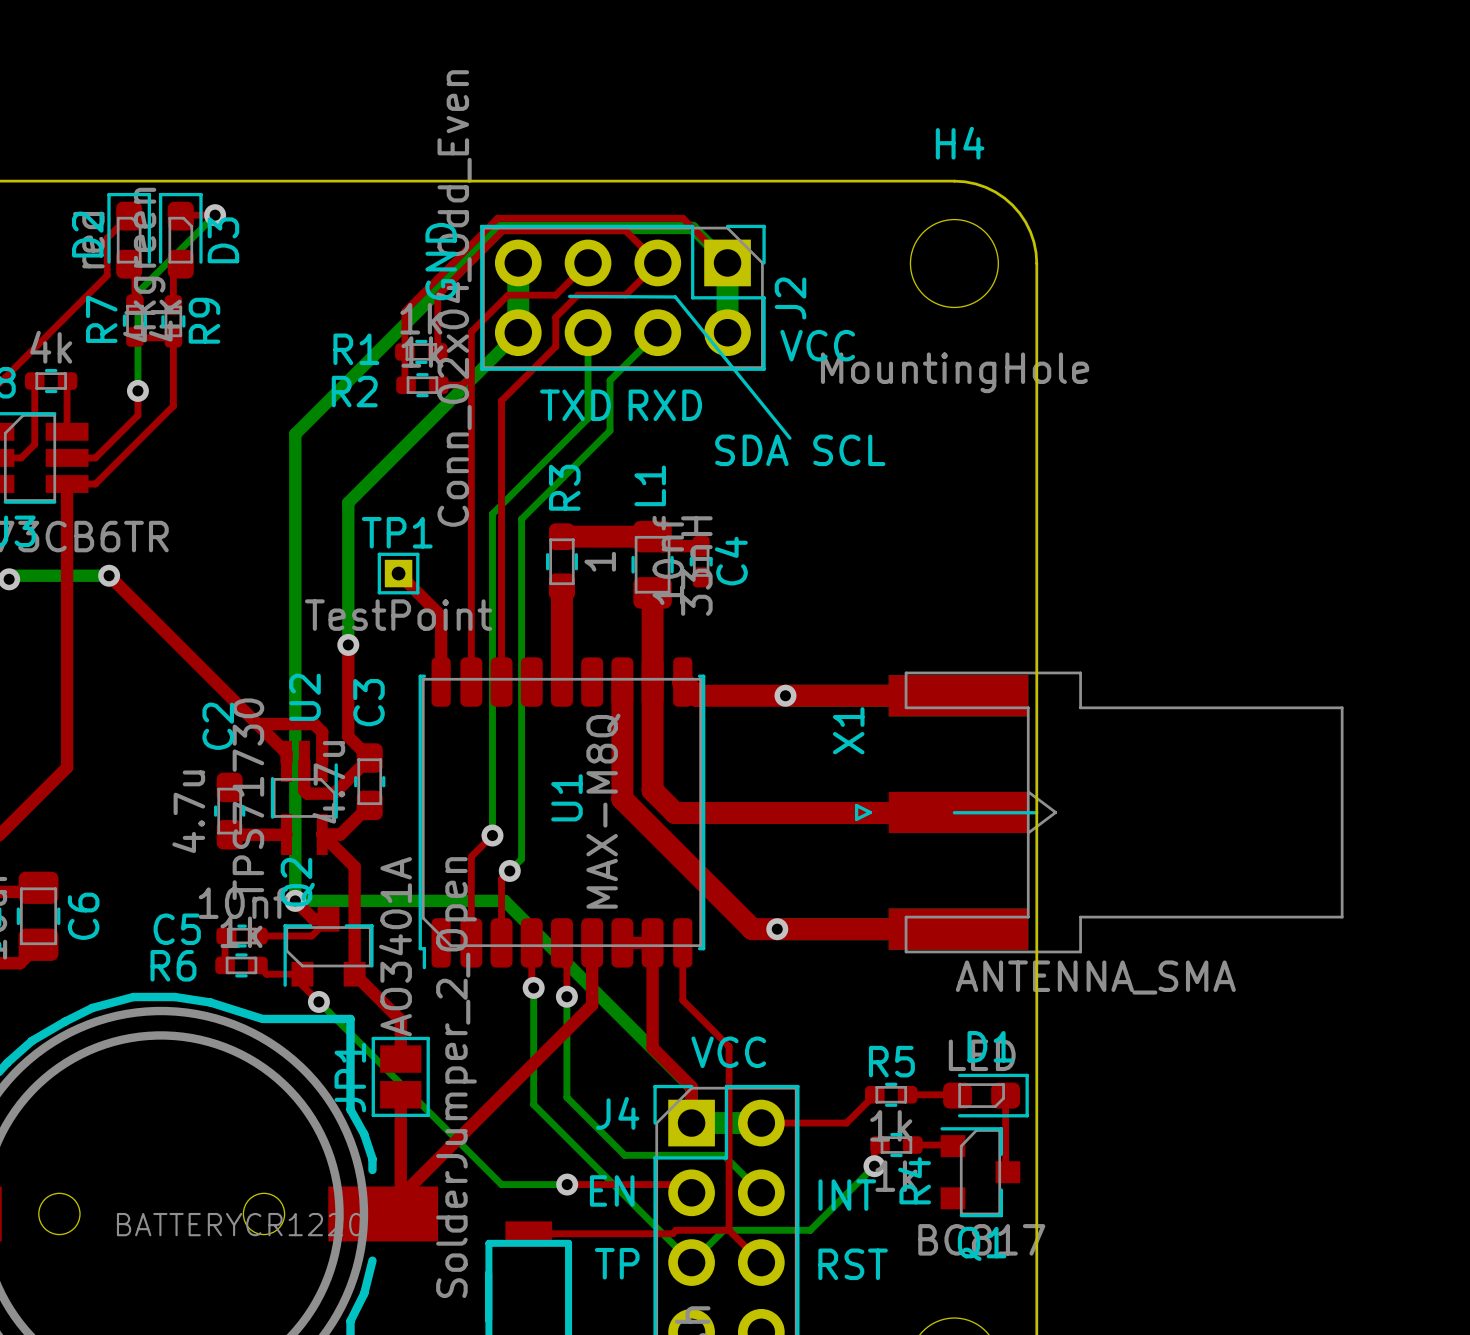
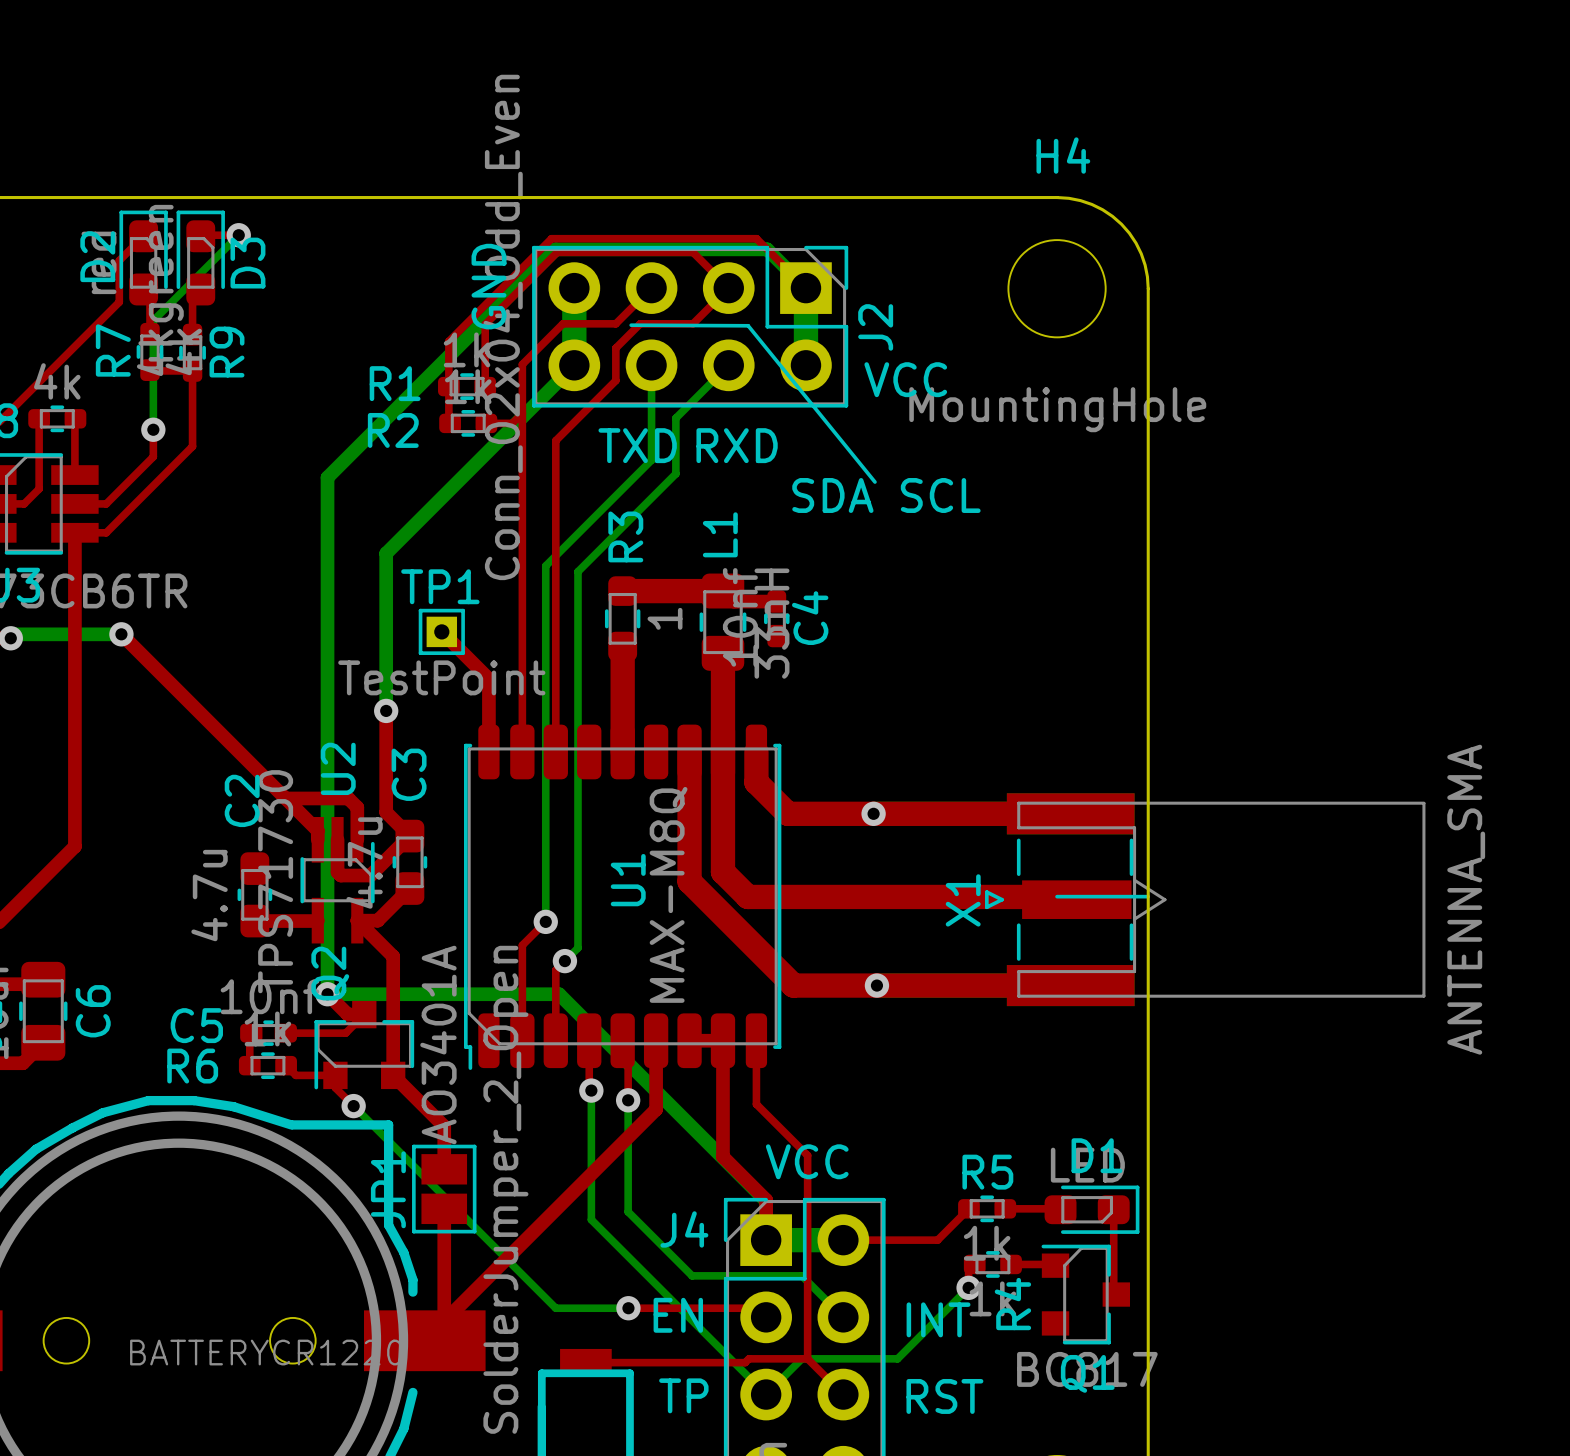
X1 footprint: [854, 671, 1344, 954] -> [985, 793, 1426, 1007]
top track: (682, 682) (696, 695) (958, 695) -> (756, 751) (756, 782) (787, 813) (1070, 813)
via position: (785, 695) -> (873, 813)
X1 name position: X1 (848, 730) -> X1 (963, 900)
top track: (716, 893) (752, 929) (958, 929) -> (793, 985) (1070, 985)
via position: (777, 929) -> (876, 985)
X1 value position: ANTENNA_SMA (1095, 977) -> ANTENNA_SMA (1466, 899)

